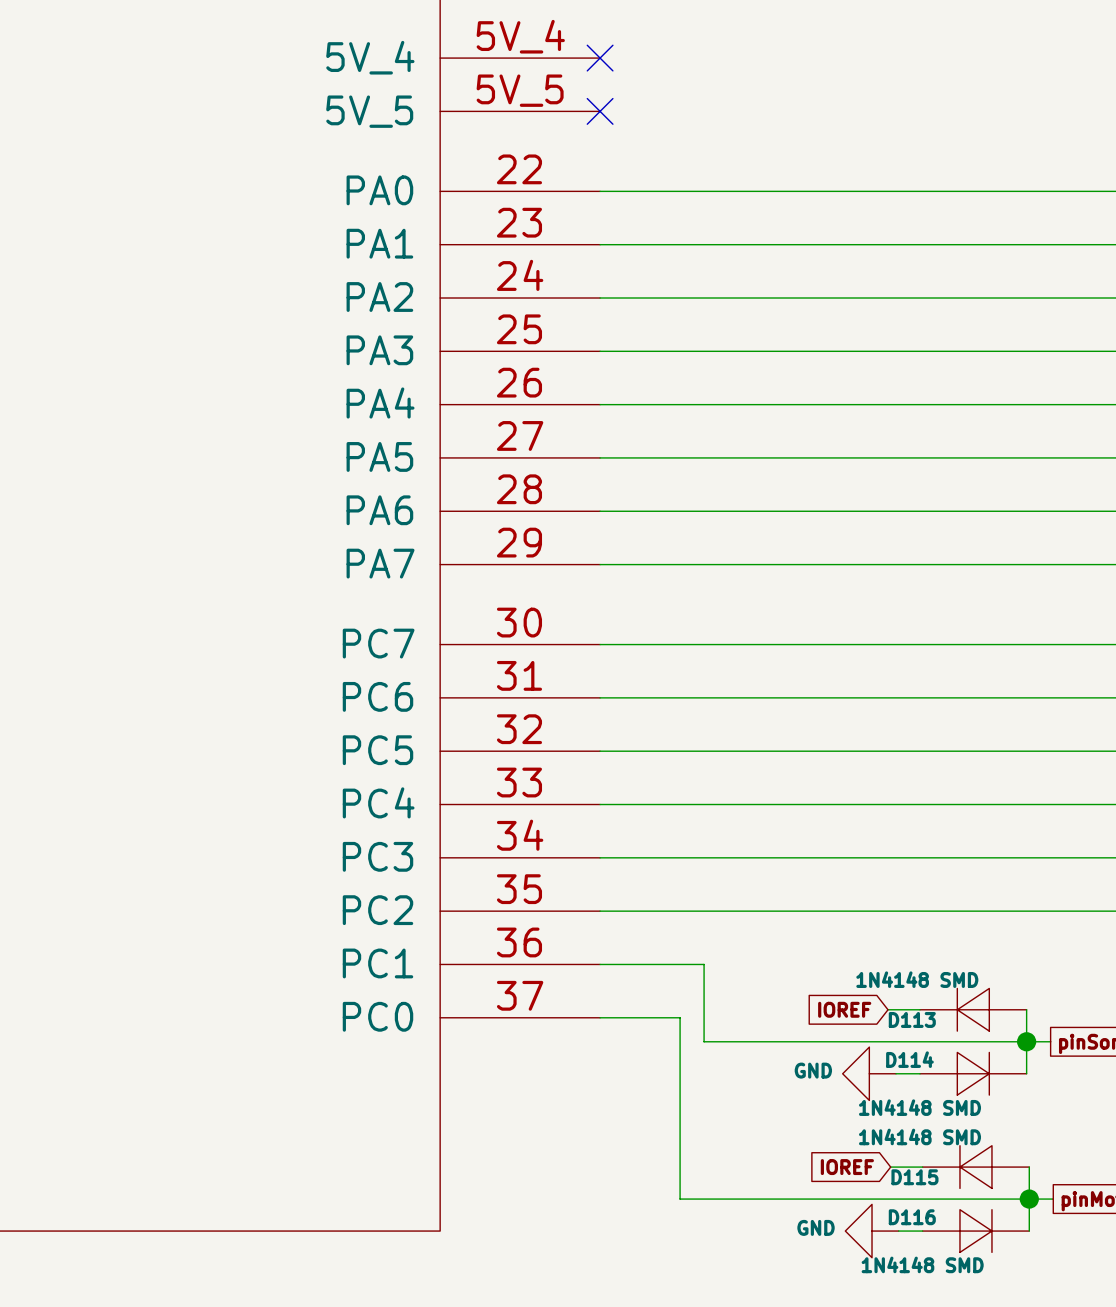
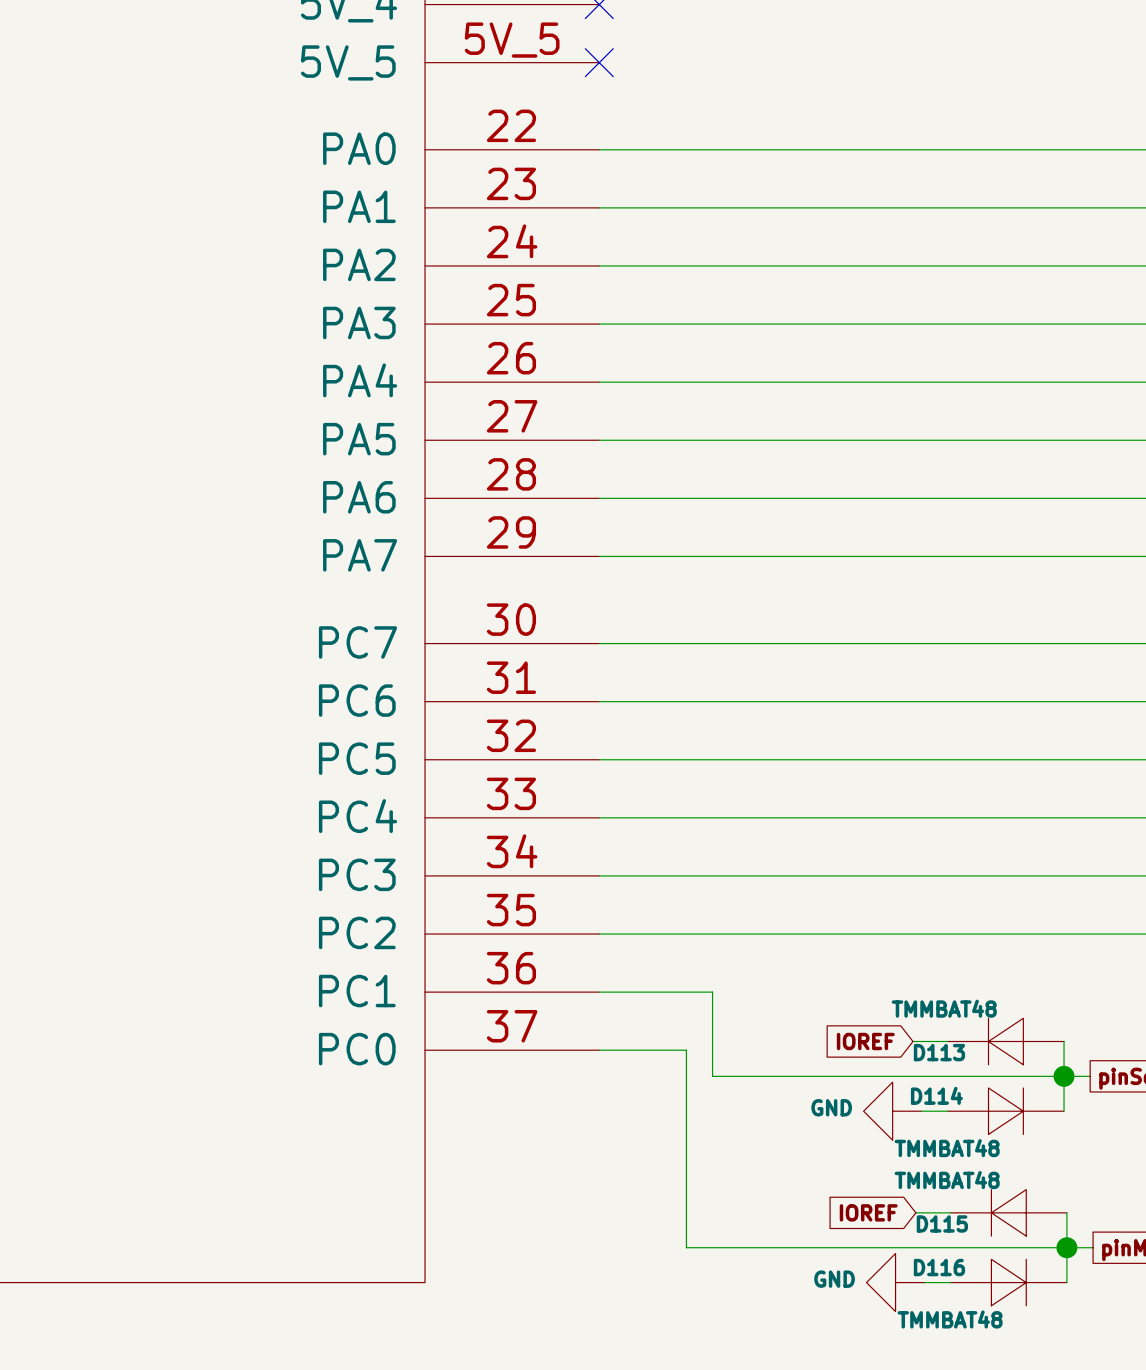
D113 value: 1N4148 SMD (917, 979) -> TMMBAT48 (944, 1008)
D114 value: 1N4148 SMD (919, 1107) -> TMMBAT48 (947, 1148)
D115 value: 1N4148 SMD (919, 1136) -> TMMBAT48 (947, 1180)
D116 value: 1N4148 SMD (922, 1264) -> TMMBAT48 (950, 1319)

